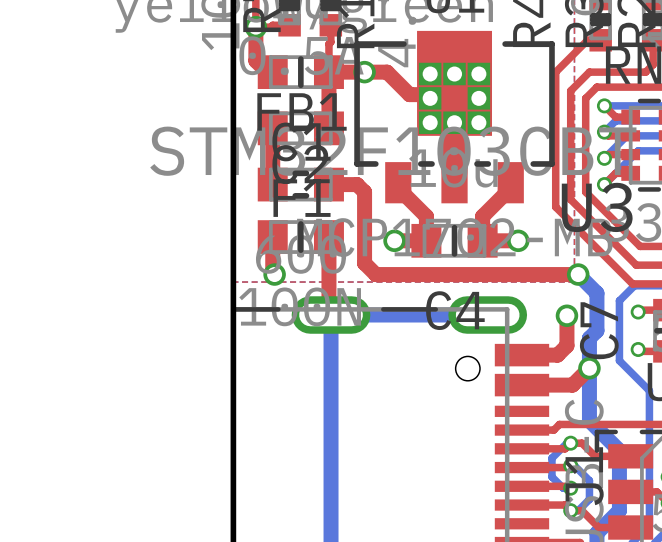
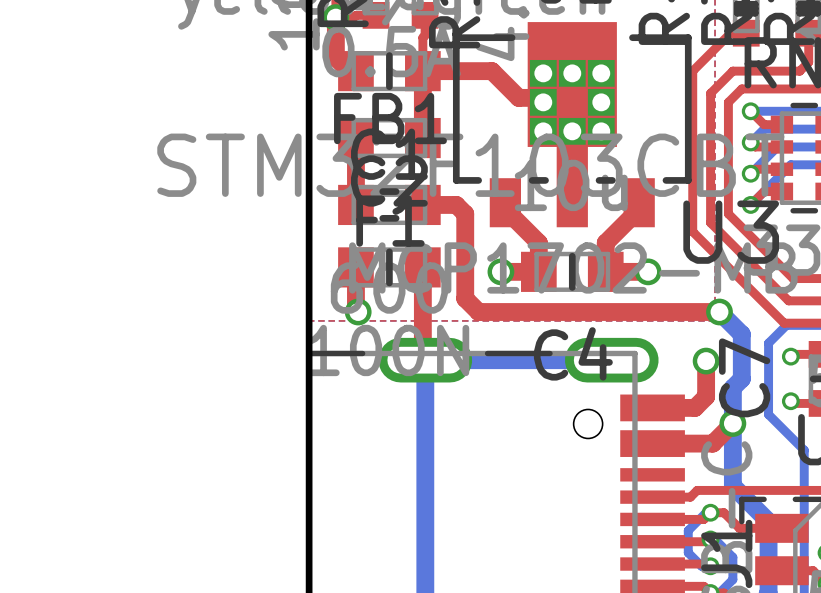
via: (364, 72) -> none

